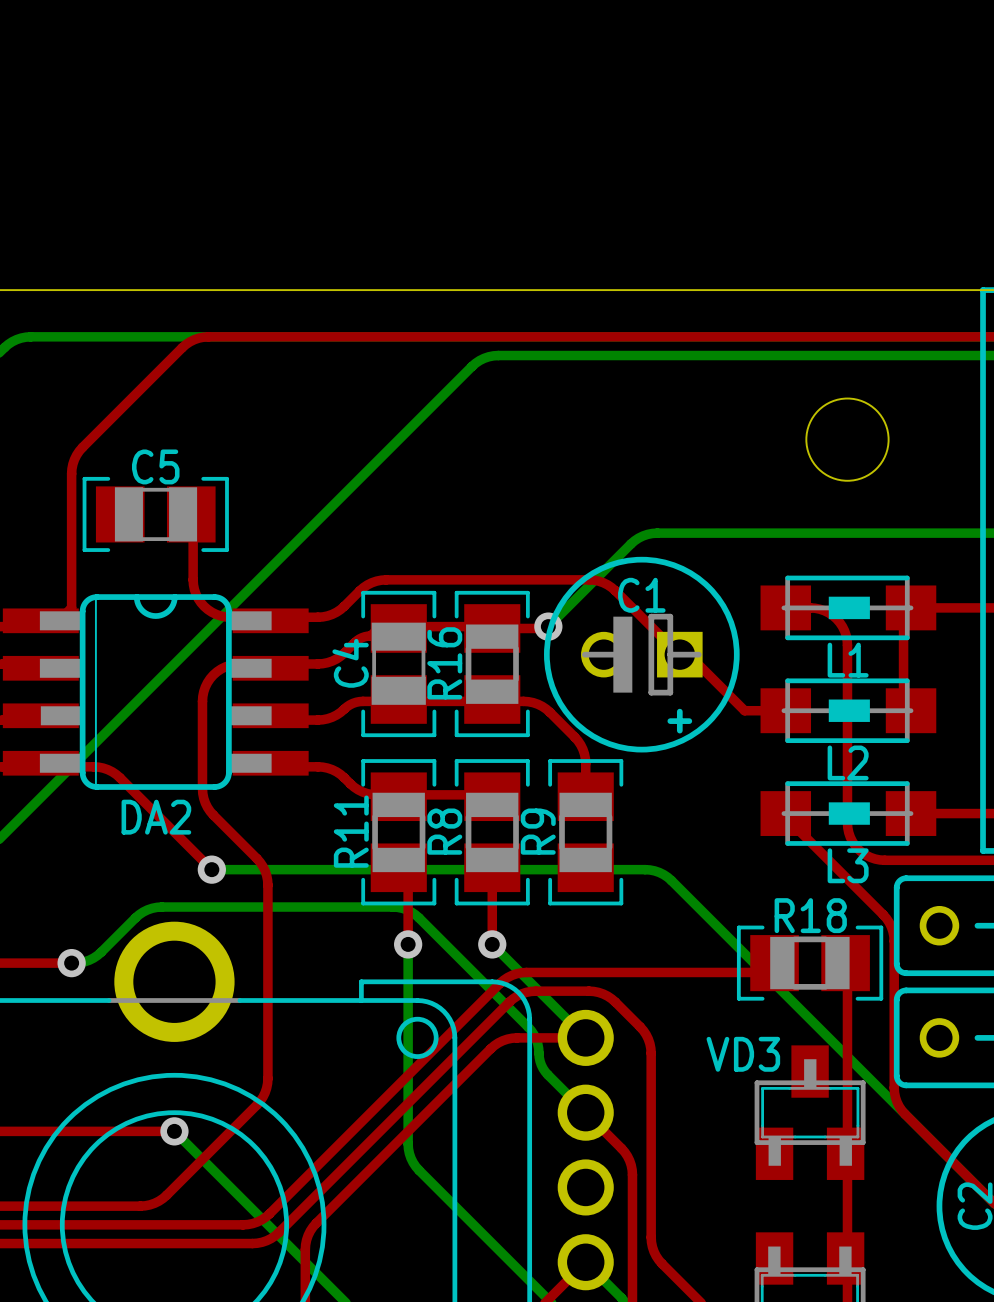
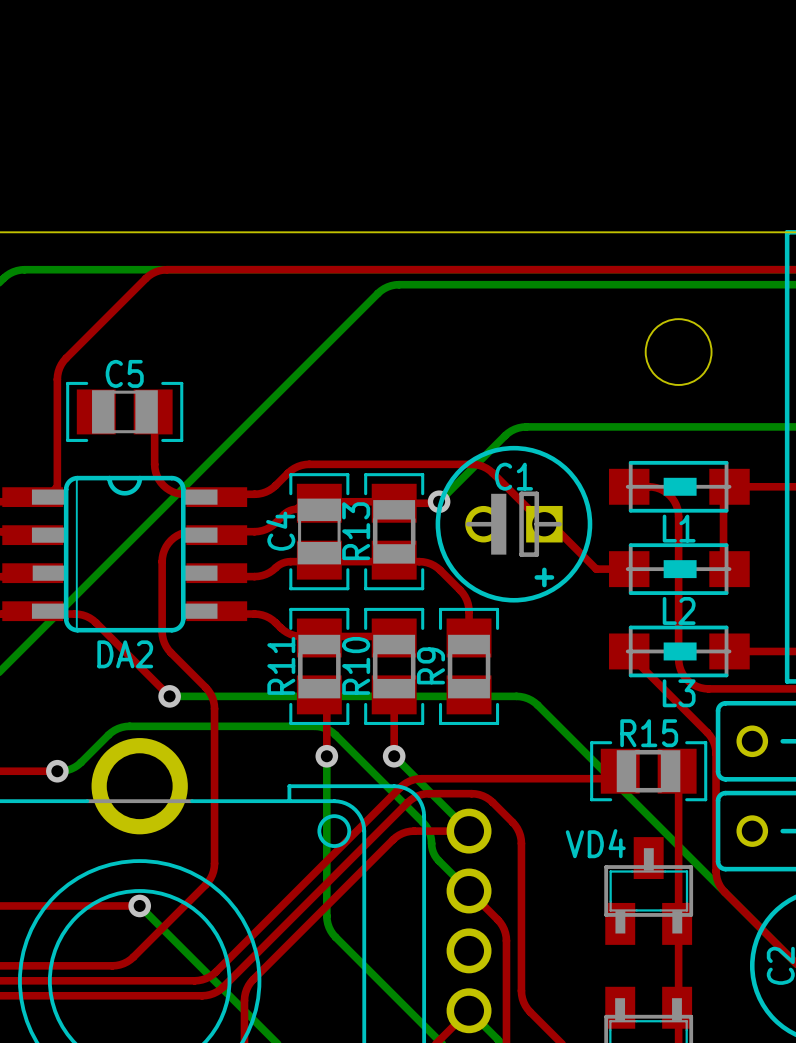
R16 name: R16 (444, 663) -> R13 (356, 531)
R8 name: R8 (444, 831) -> R10 (356, 665)
R18 name: R18 (810, 915) -> R15 (649, 733)
VD3 name: VD3 (743, 1054) -> VD4 (595, 843)

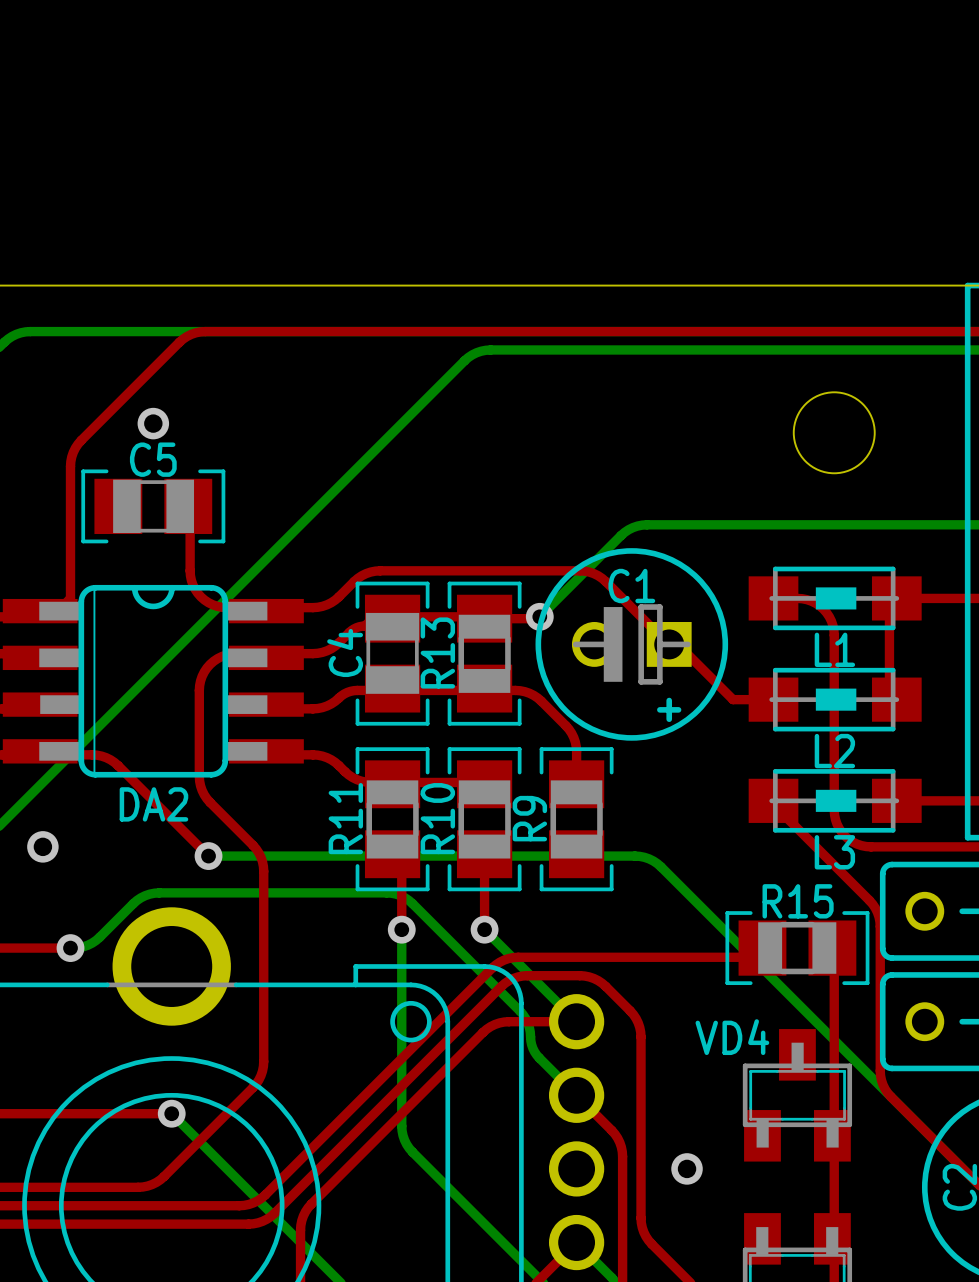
via: none -> (153, 423)
via: none -> (42, 846)
via: none -> (687, 1168)

